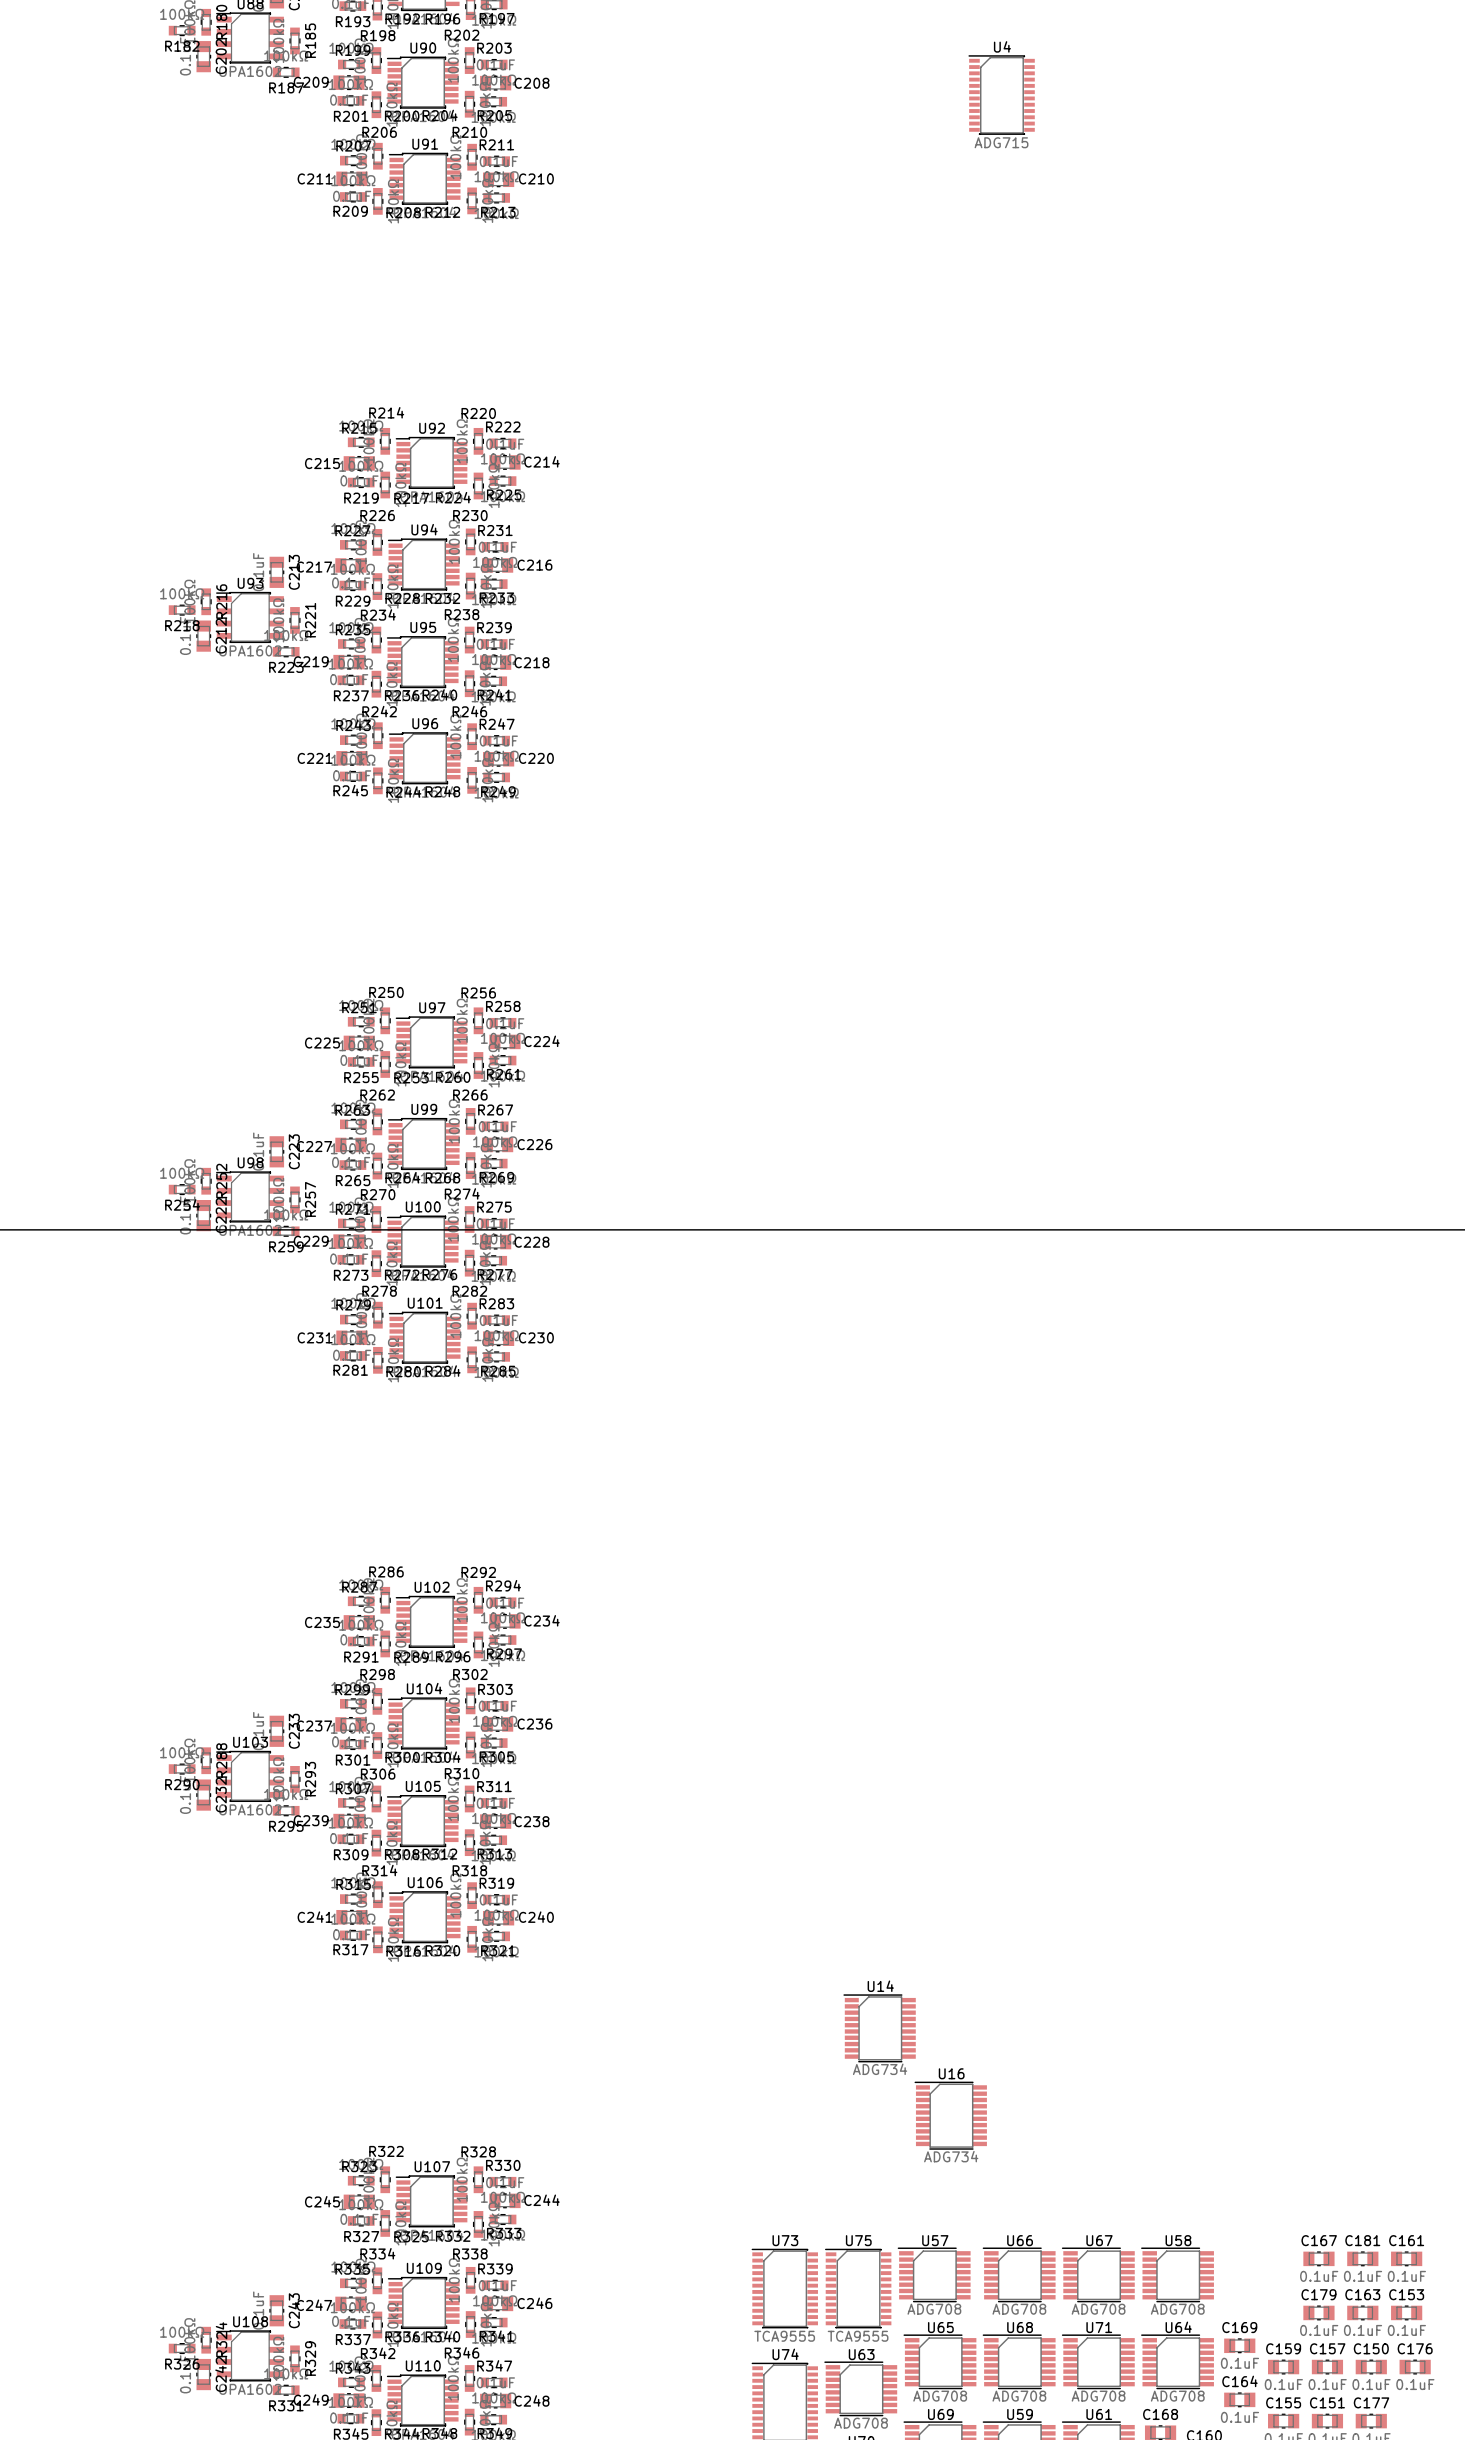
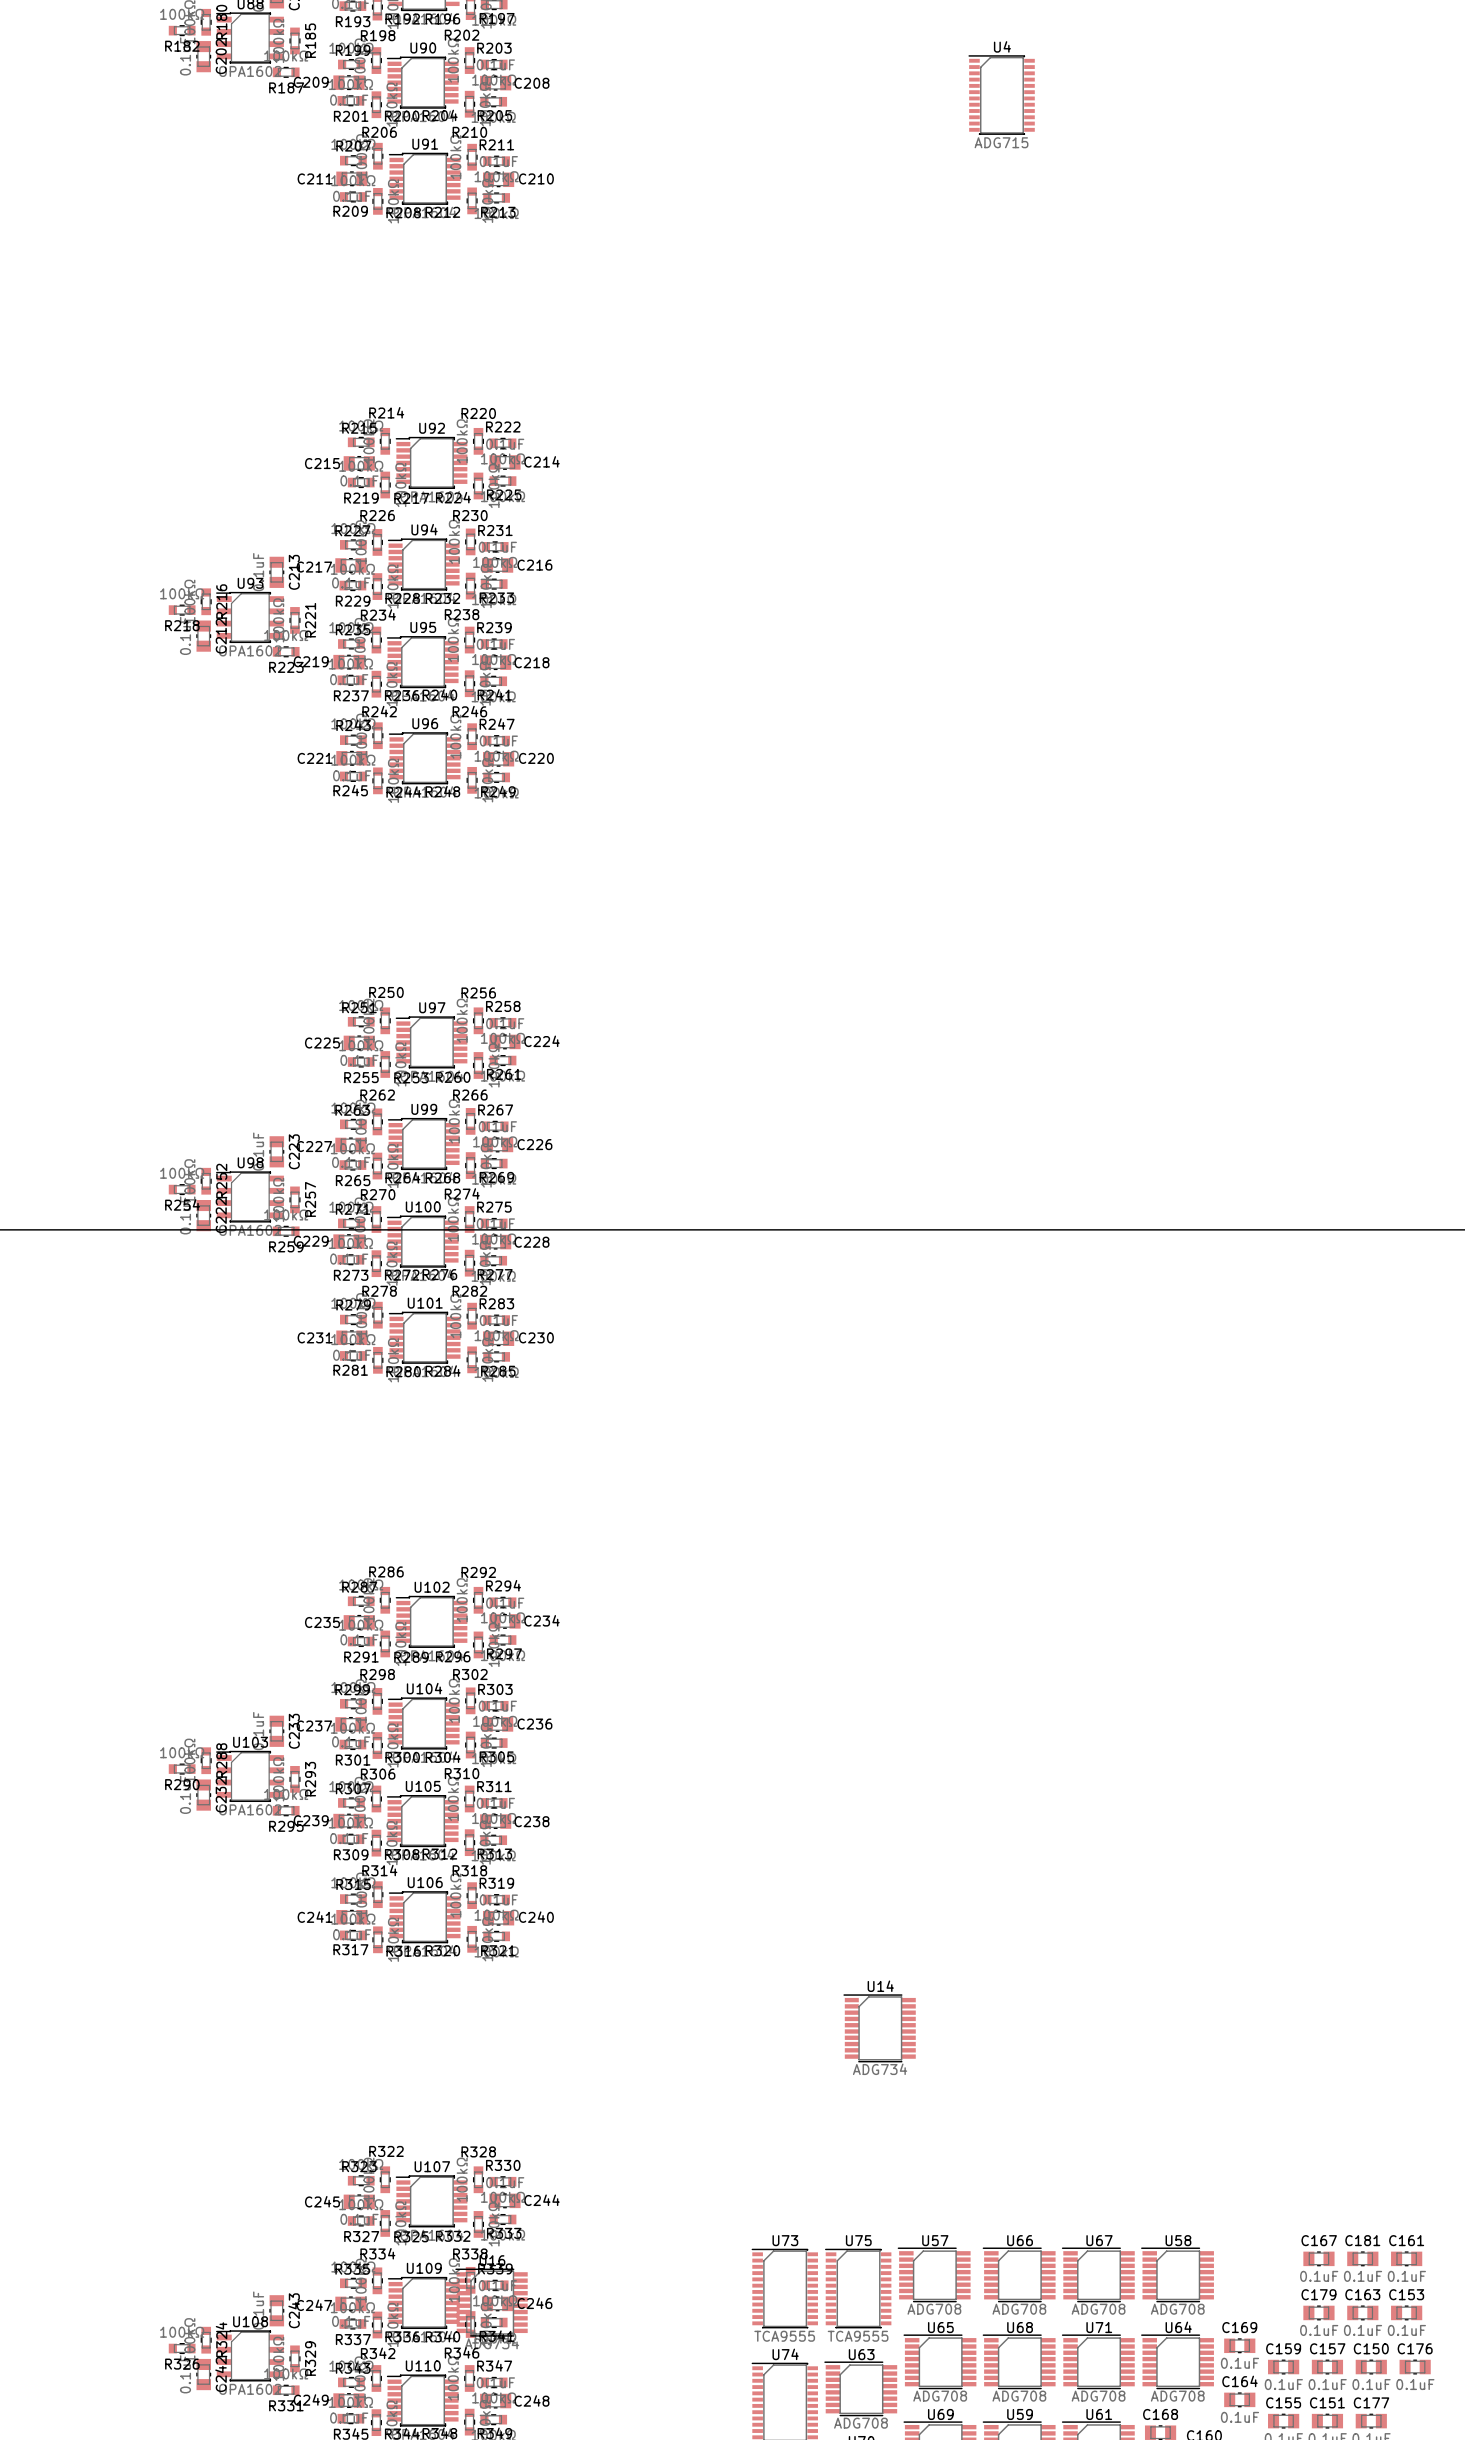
U16 position: (950, 2115) -> (491, 2302)

